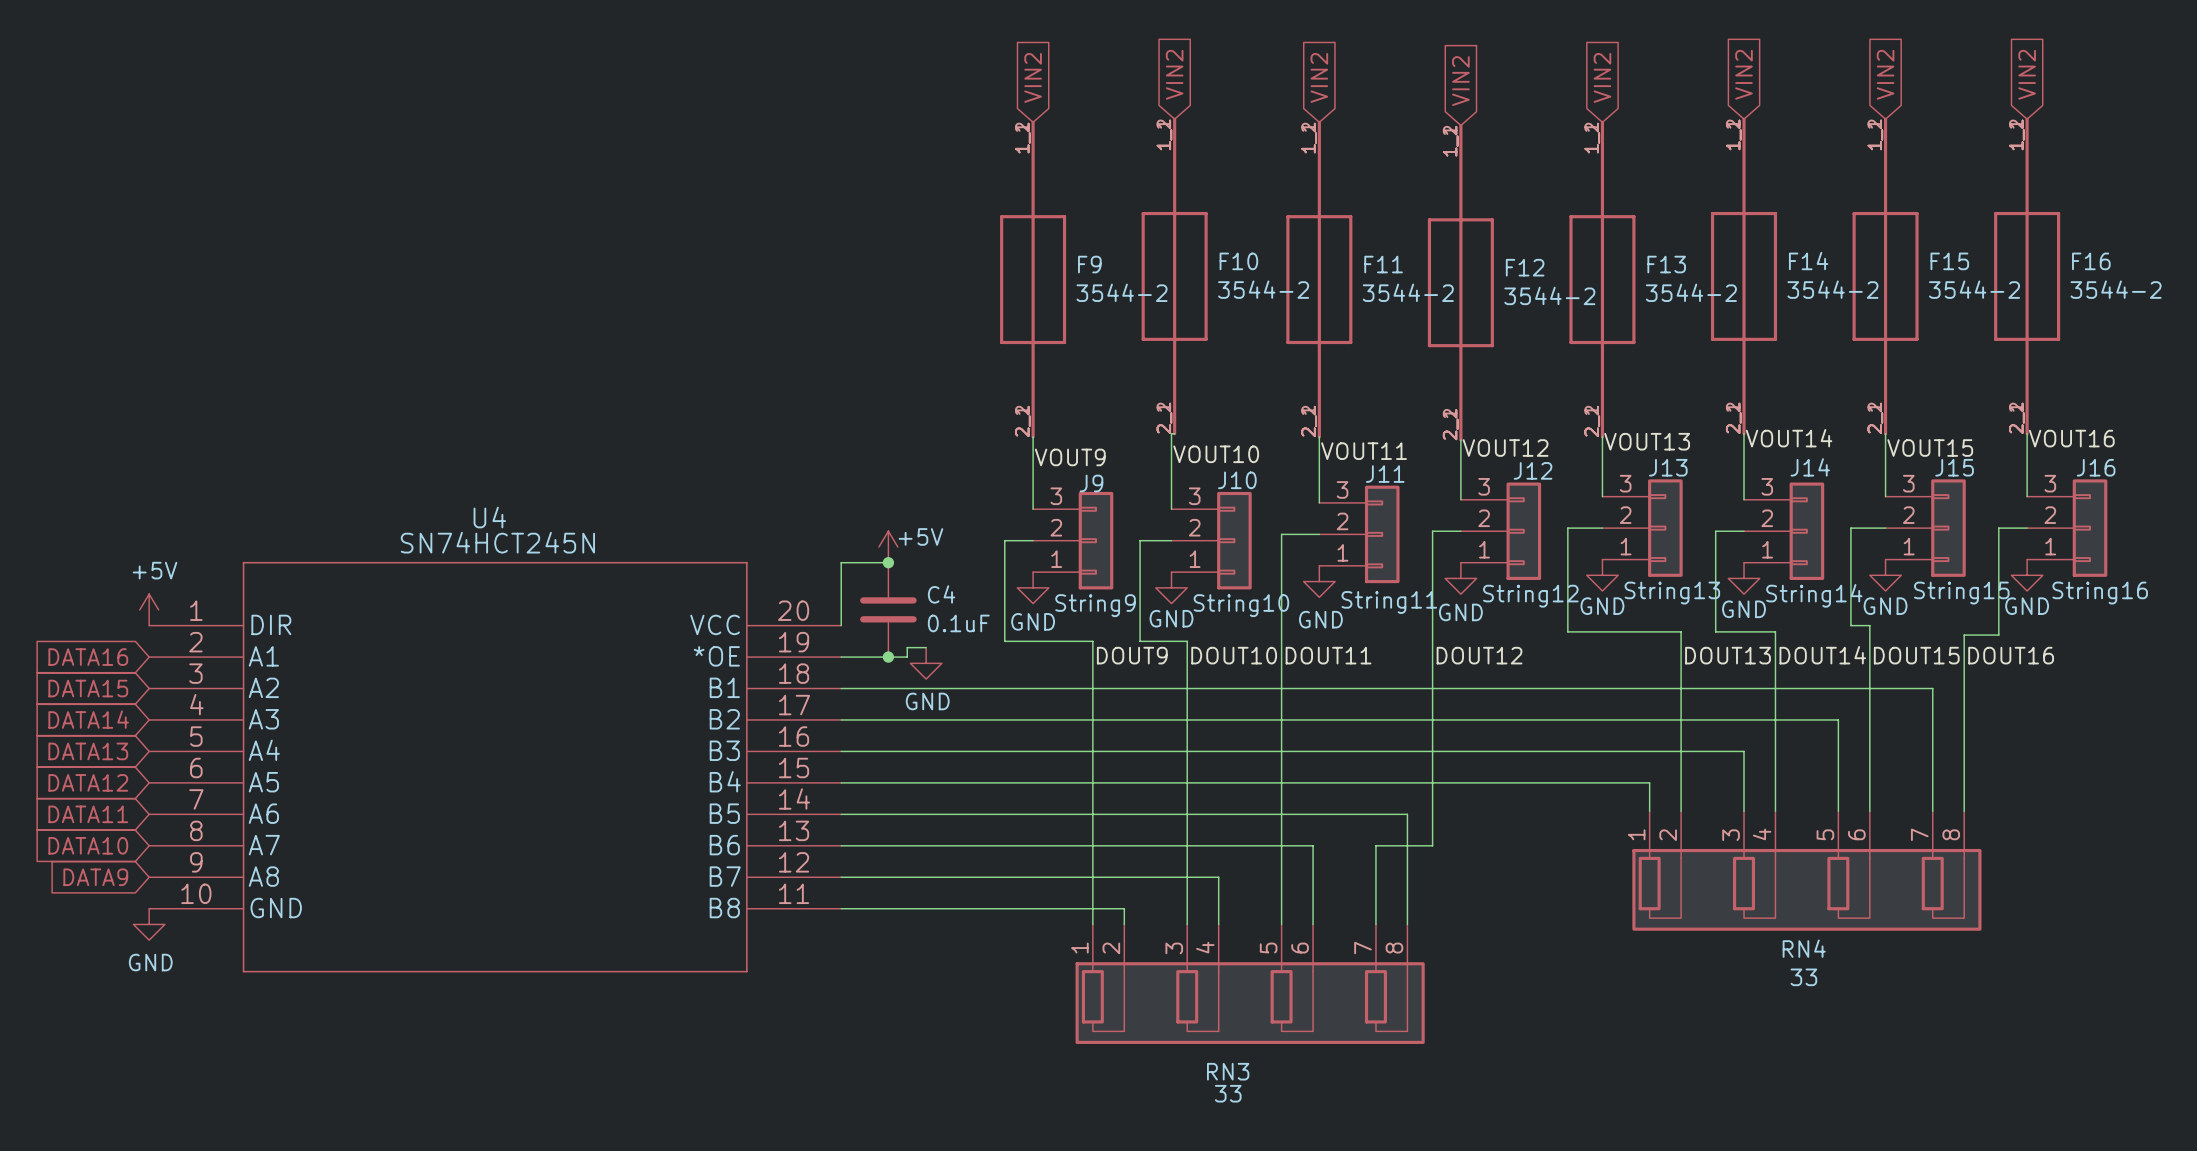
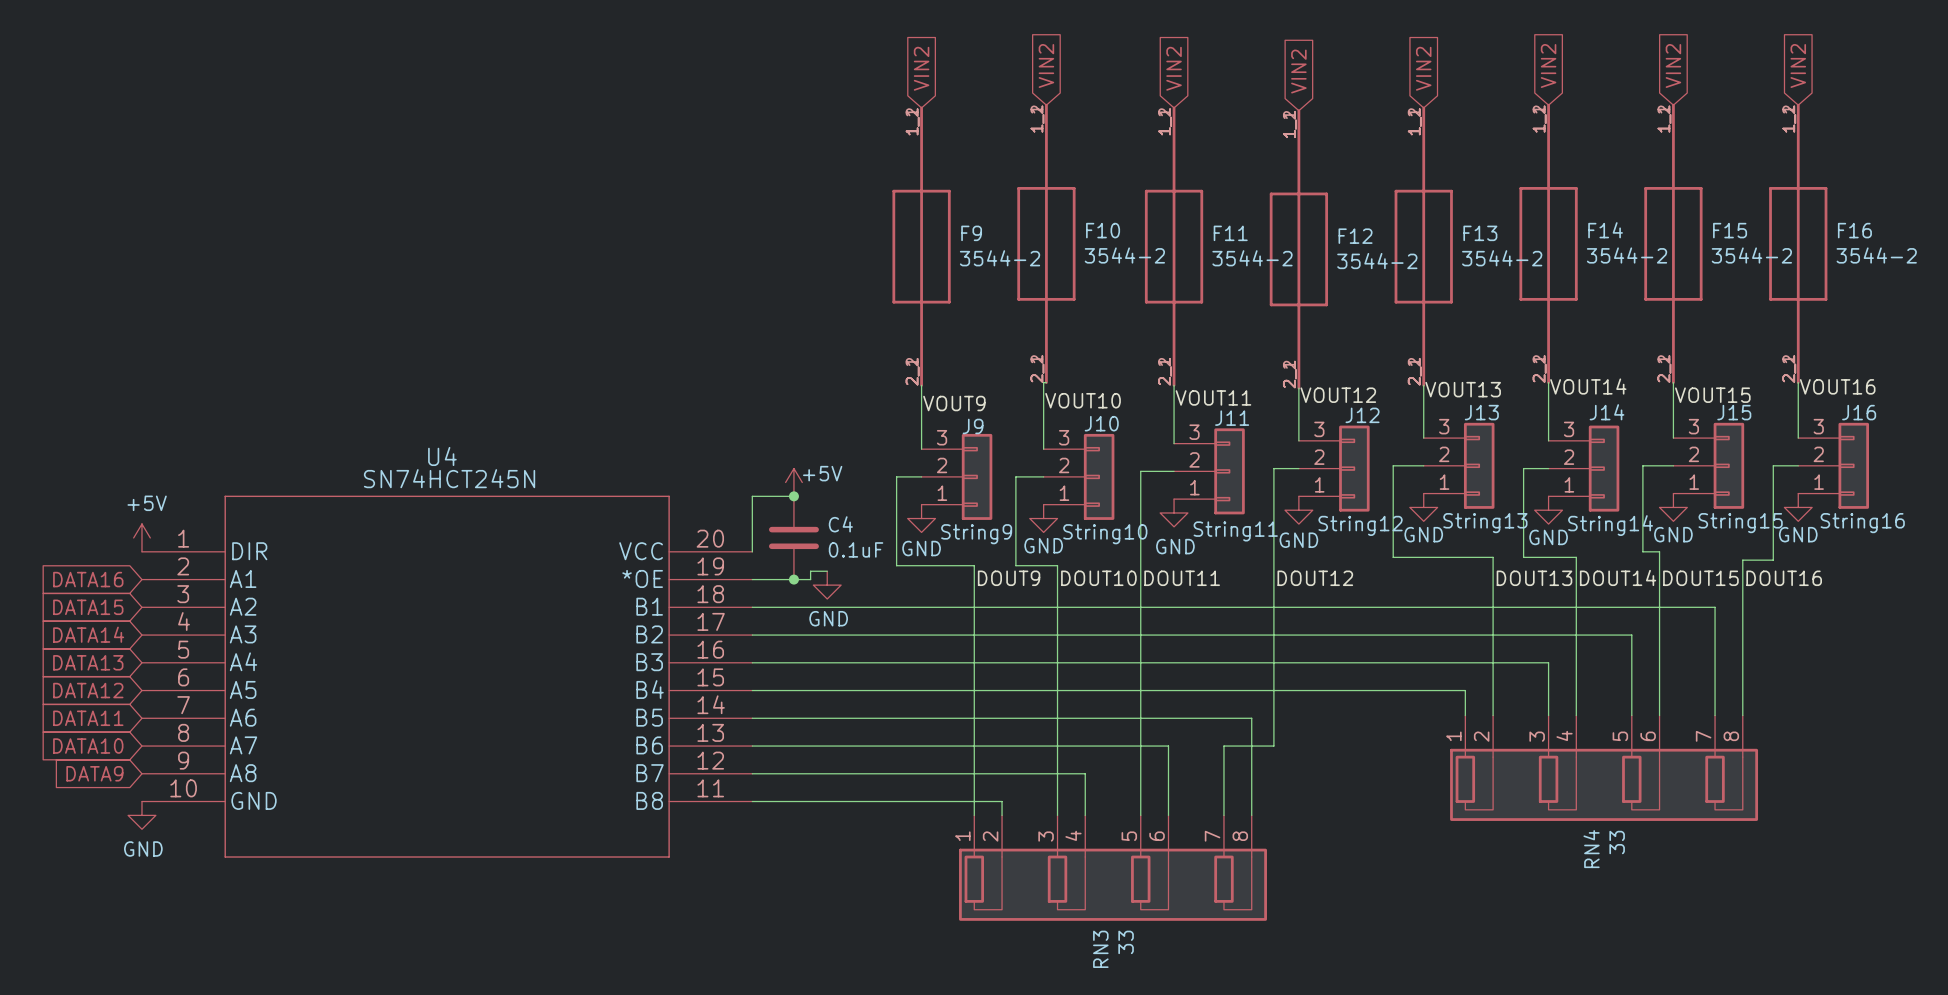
RN4 name rotation: 0° (1804, 948) -> 90° counterclockwise (1591, 849)
RN4 value rotation: 0° (1803, 977) -> 90° counterclockwise (1617, 842)
RN3 name rotation: 0° (1228, 1071) -> 90° counterclockwise (1100, 949)
RN3 value rotation: 0° (1228, 1093) -> 90° counterclockwise (1126, 942)
RN3 value position: 33 (1228, 1093) -> 33 (1126, 942)

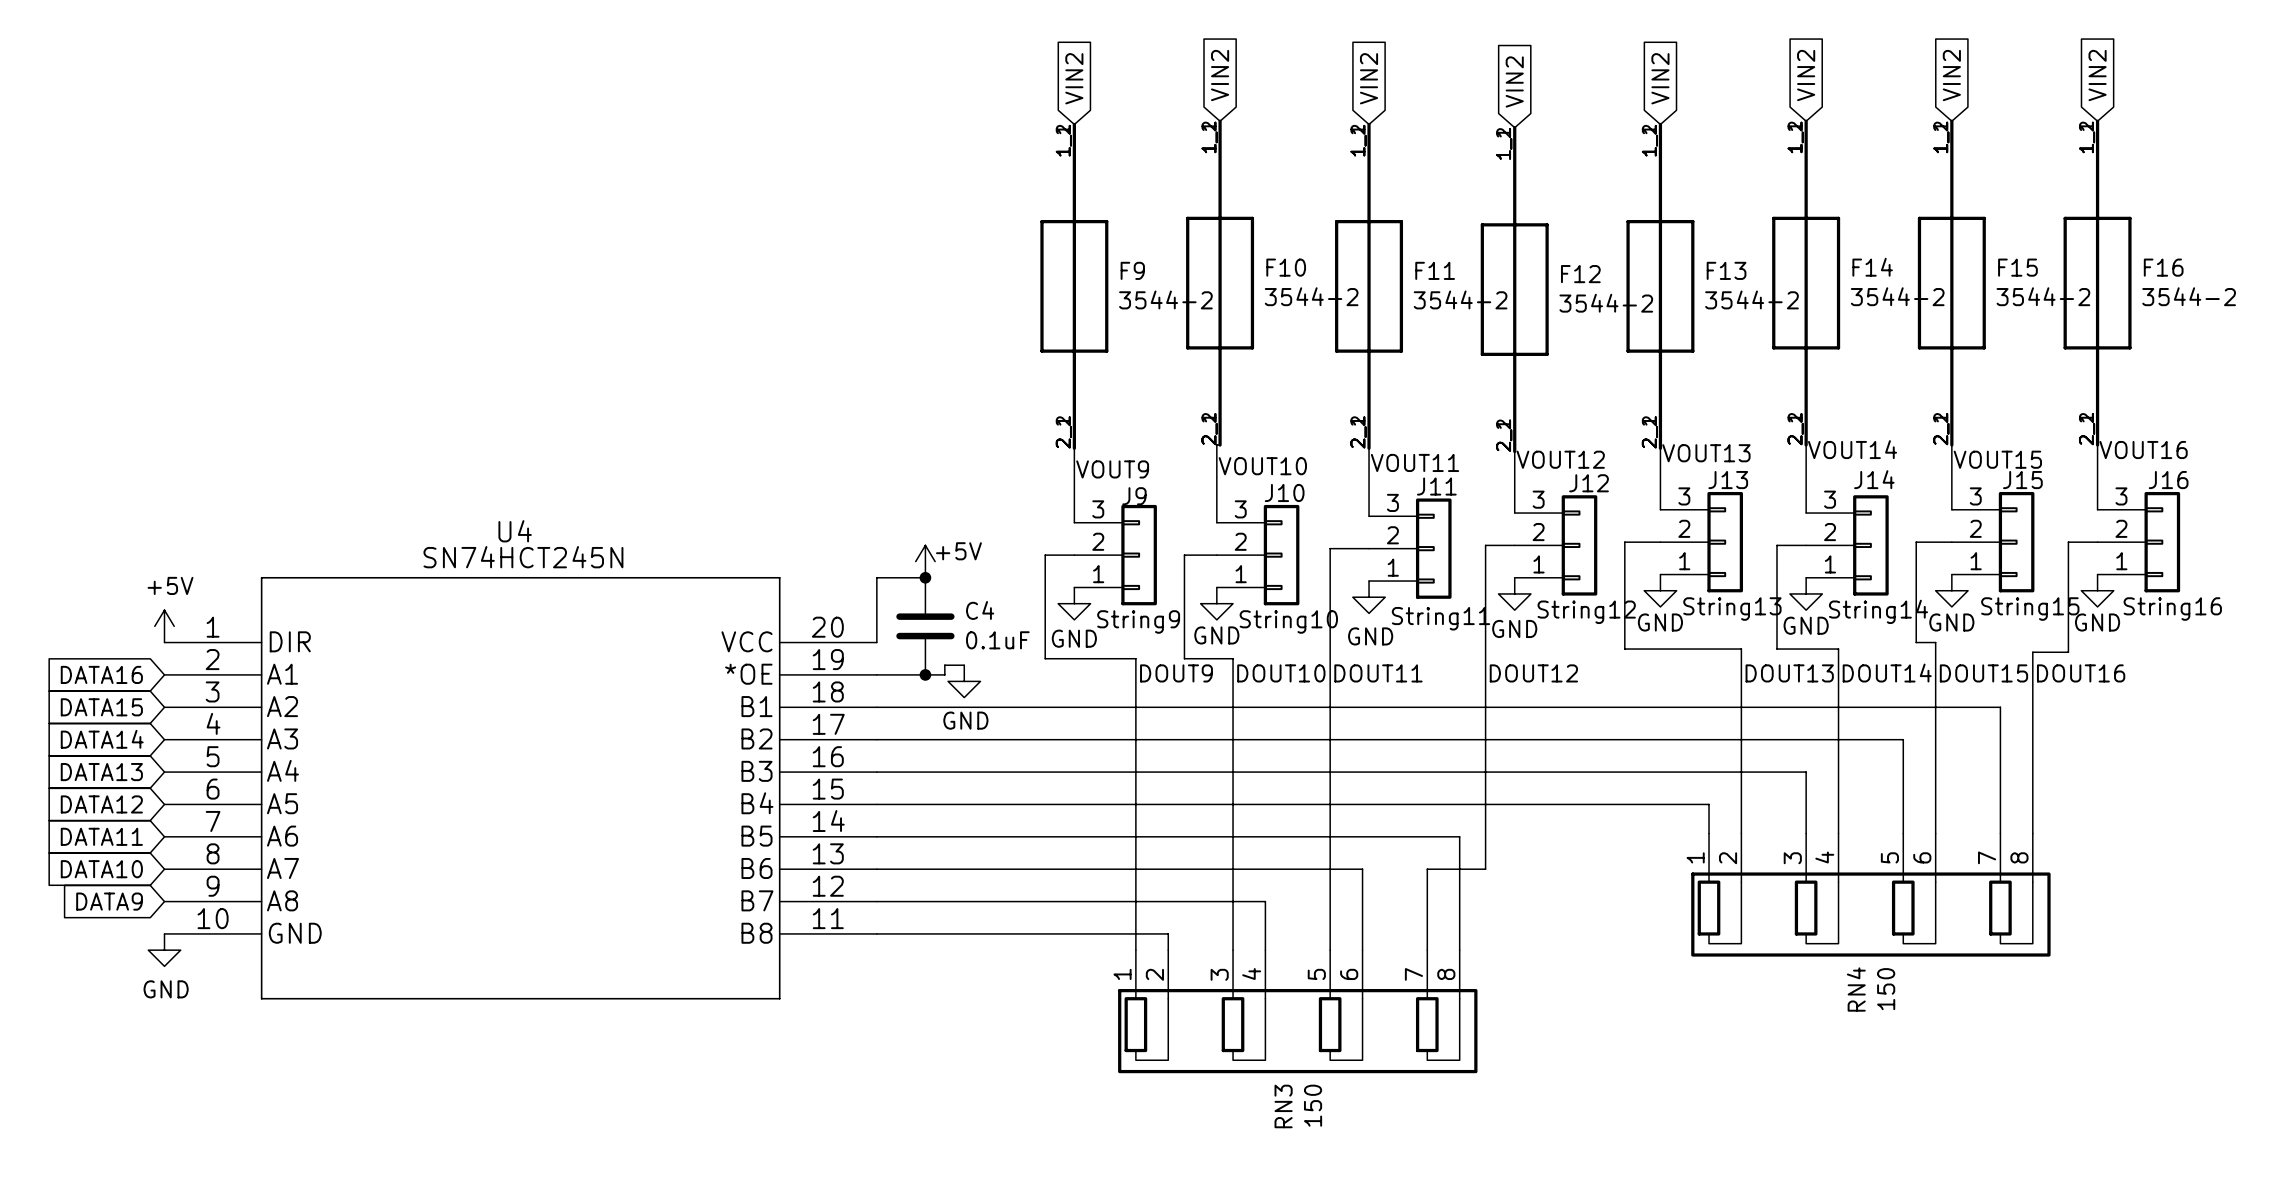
RN4 value: 33 (1617, 842) -> 150 (1886, 989)
RN3 value: 33 (1126, 942) -> 150 (1313, 1105)

